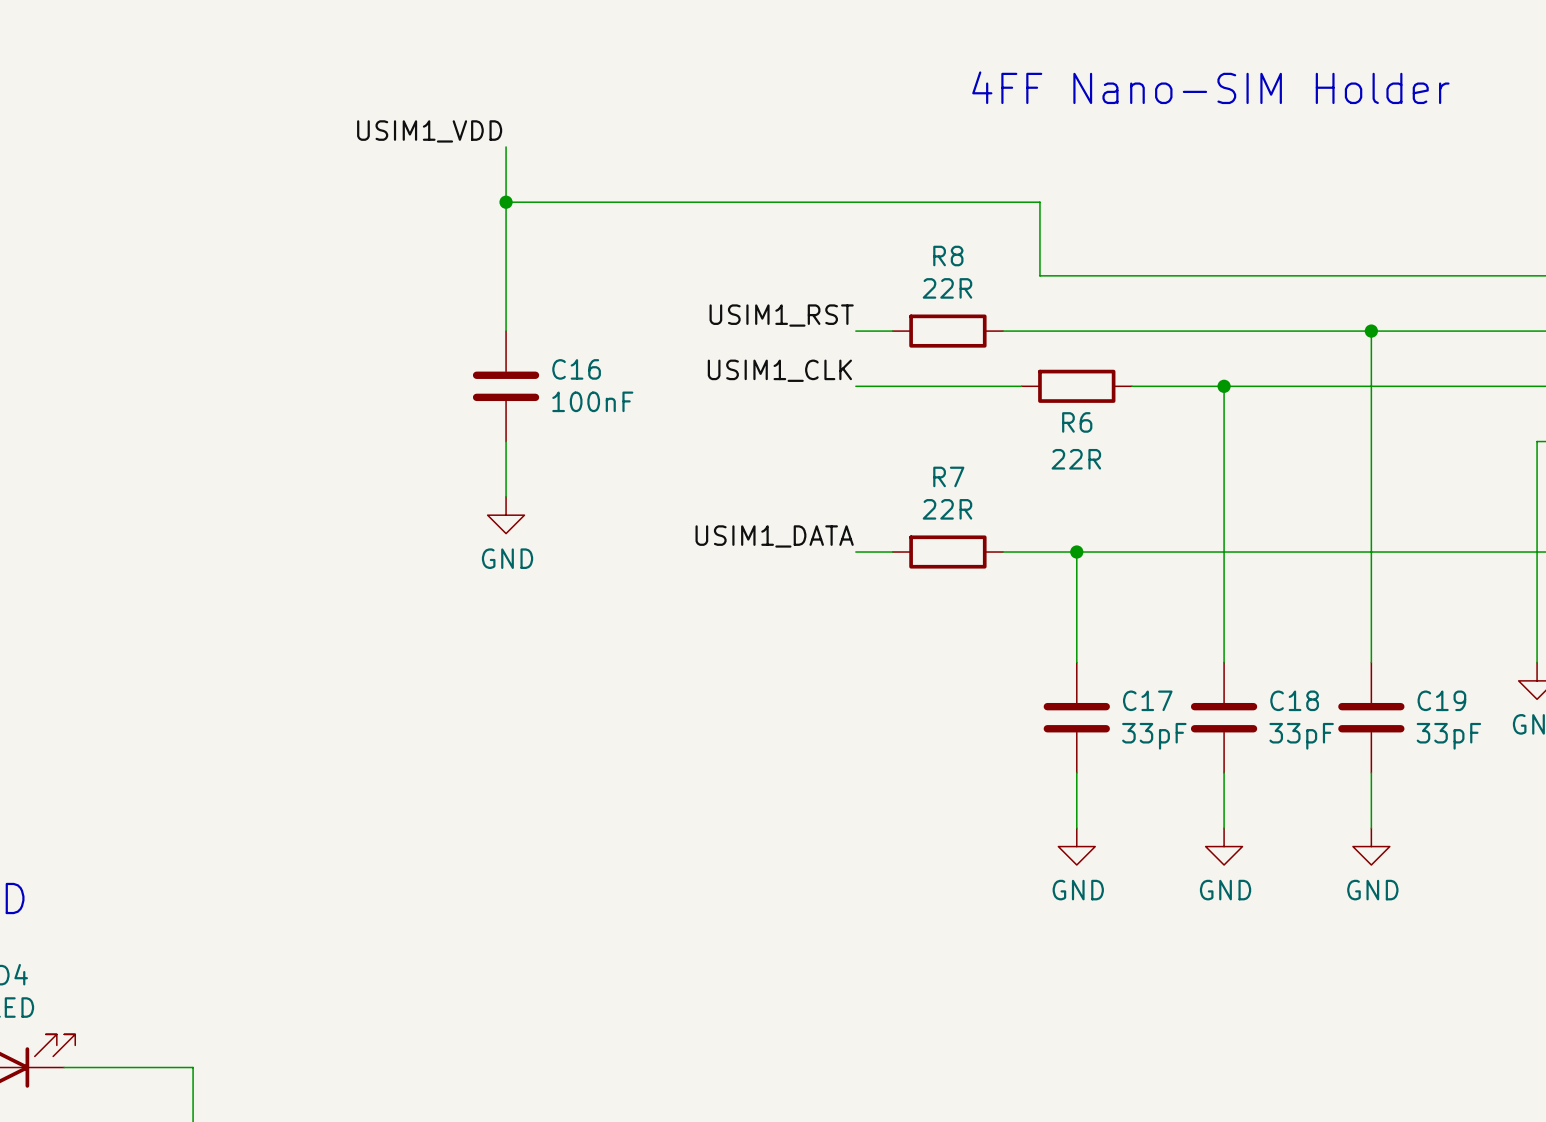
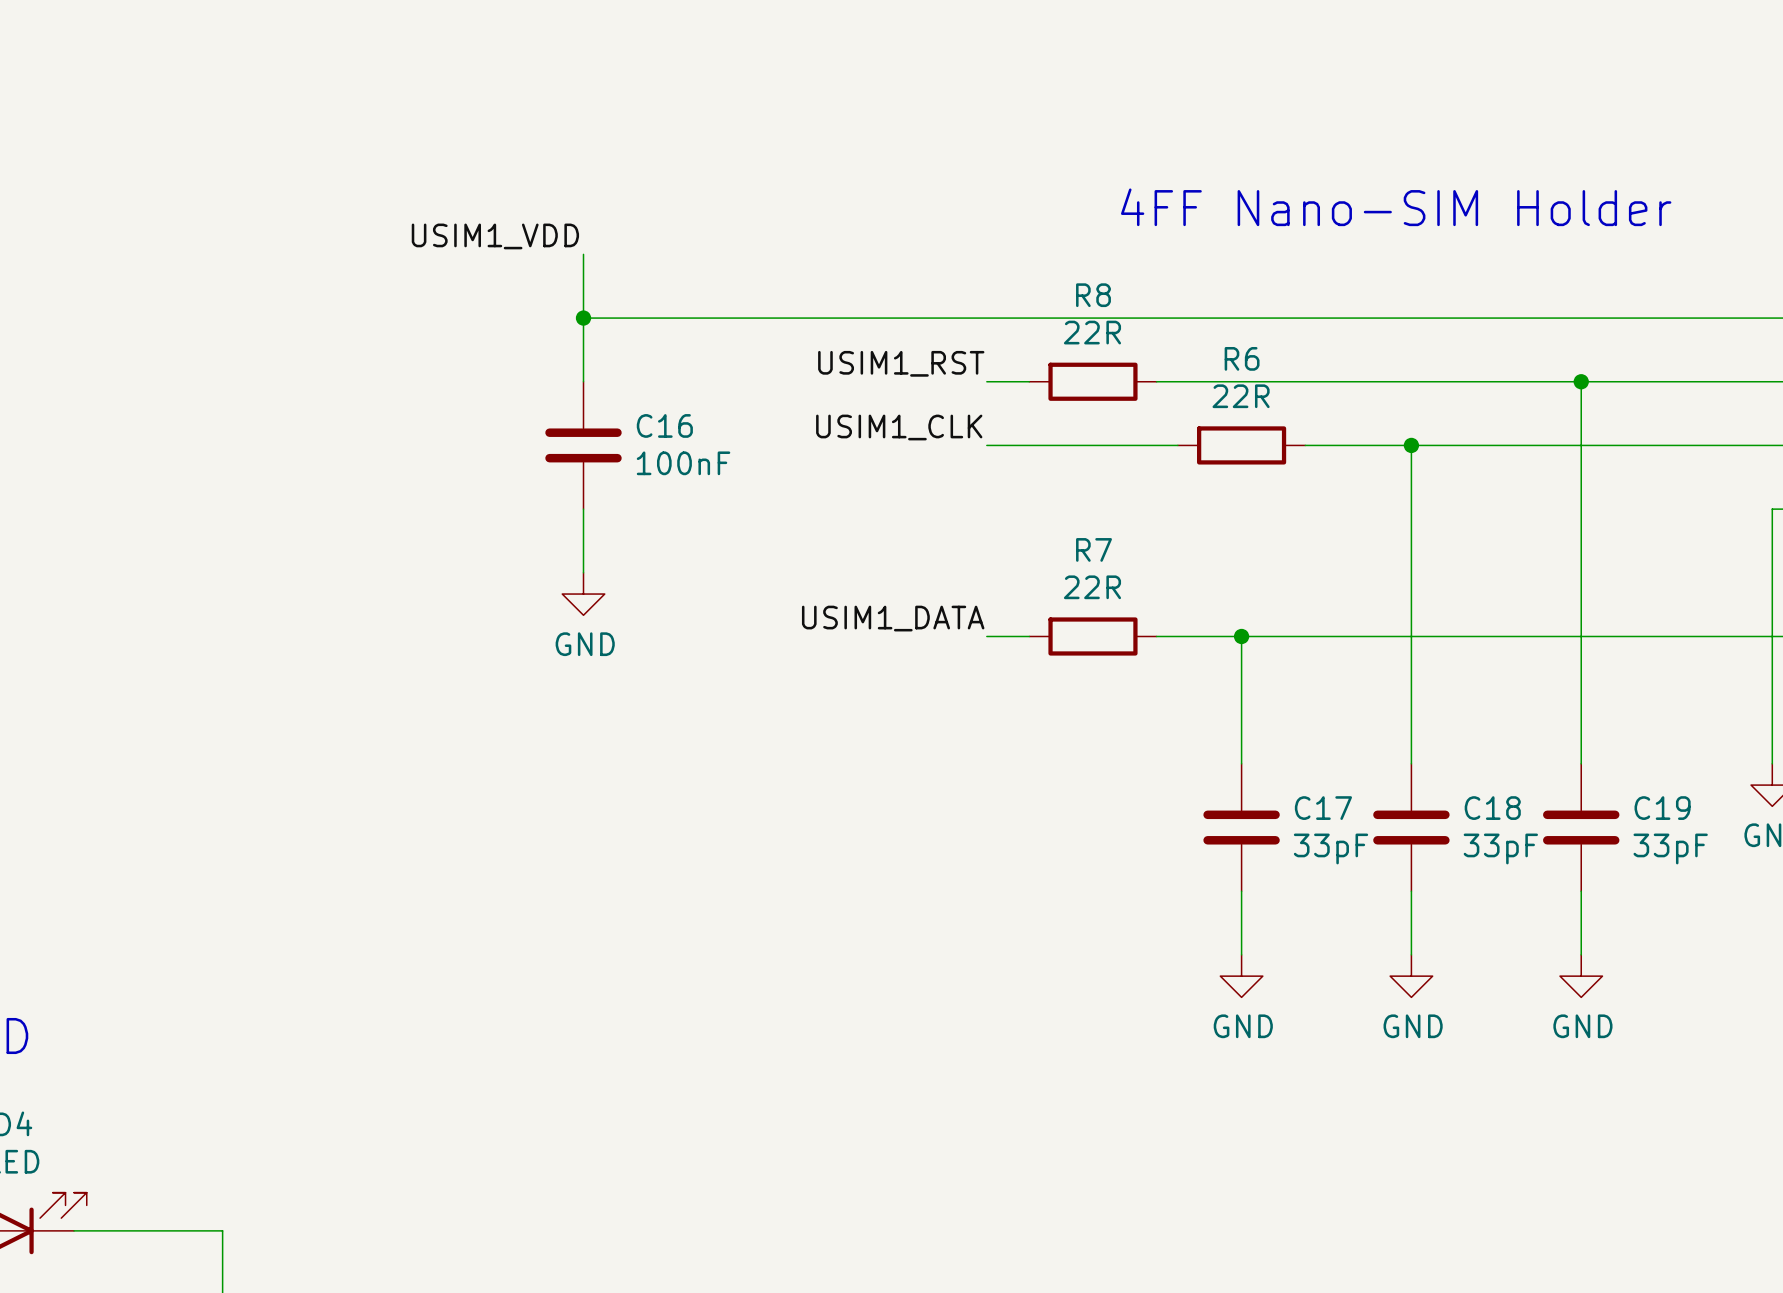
text position: 4FF Nano-SIM Holder (1210, 87) -> 4FF Nano-SIM Holder (1396, 207)
label position: USIM1_VDD (429, 131) -> USIM1_VDD (495, 236)
wire: (506, 146) (506, 220) -> none
wire: (506, 202) (1039, 202) (1039, 275) -> (583, 318) (1199, 318)
junction position: (506, 202) -> (583, 318)
R6 name position: R6 (1077, 422) -> R6 (1242, 358)
R6 value position: 22R (1076, 459) -> 22R (1241, 396)

